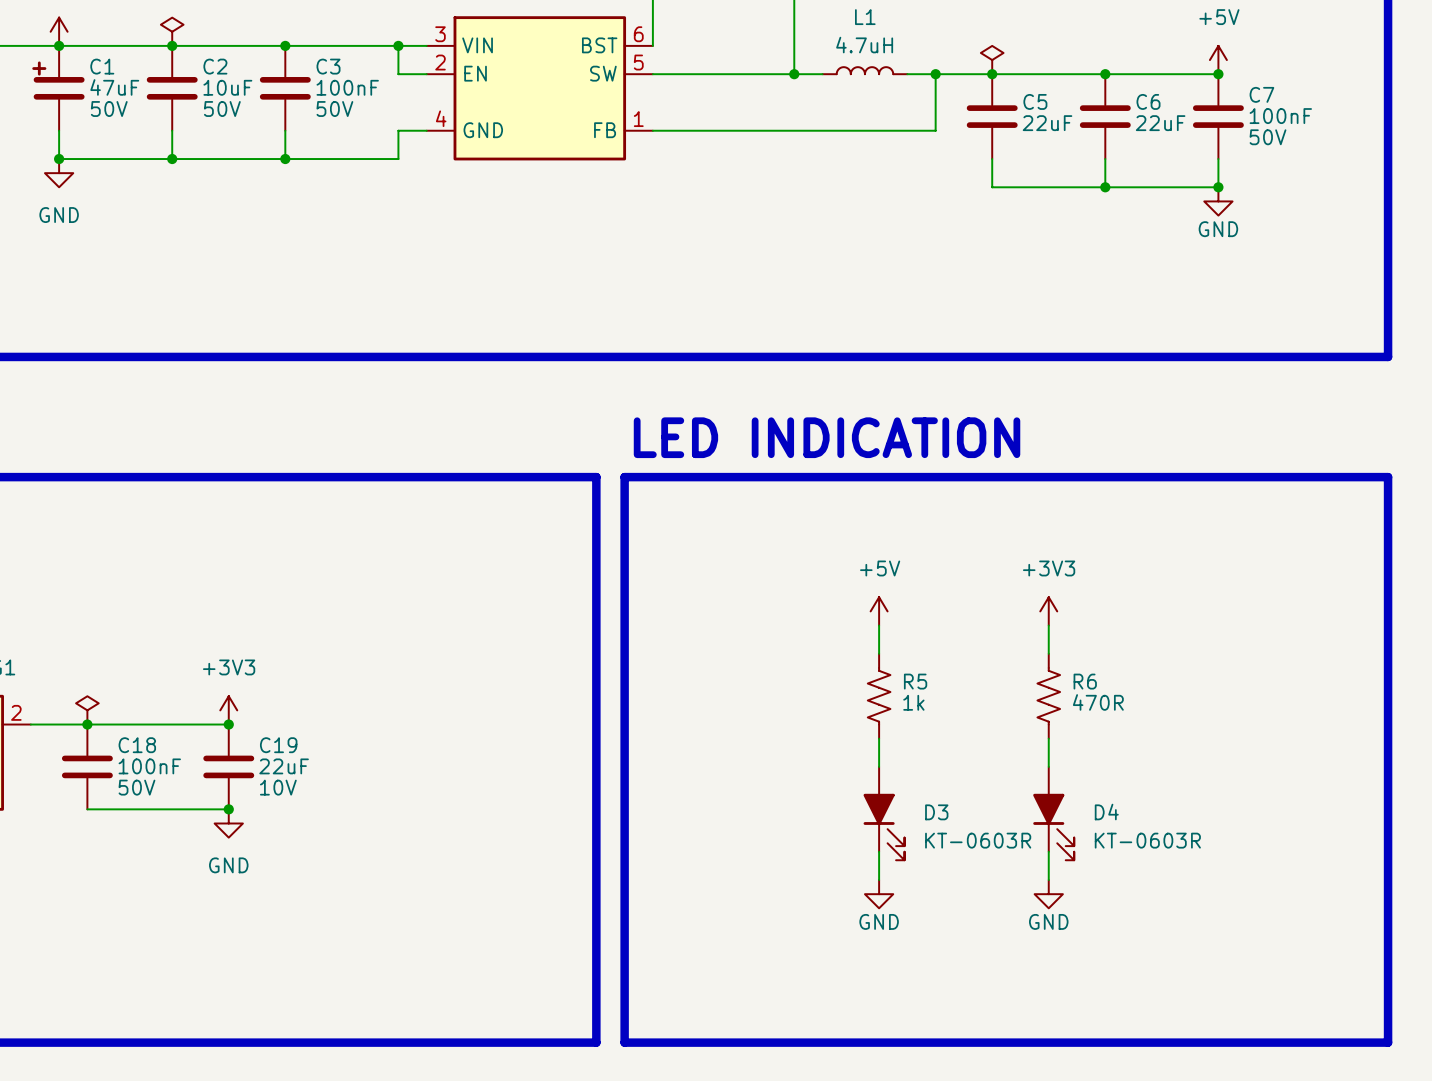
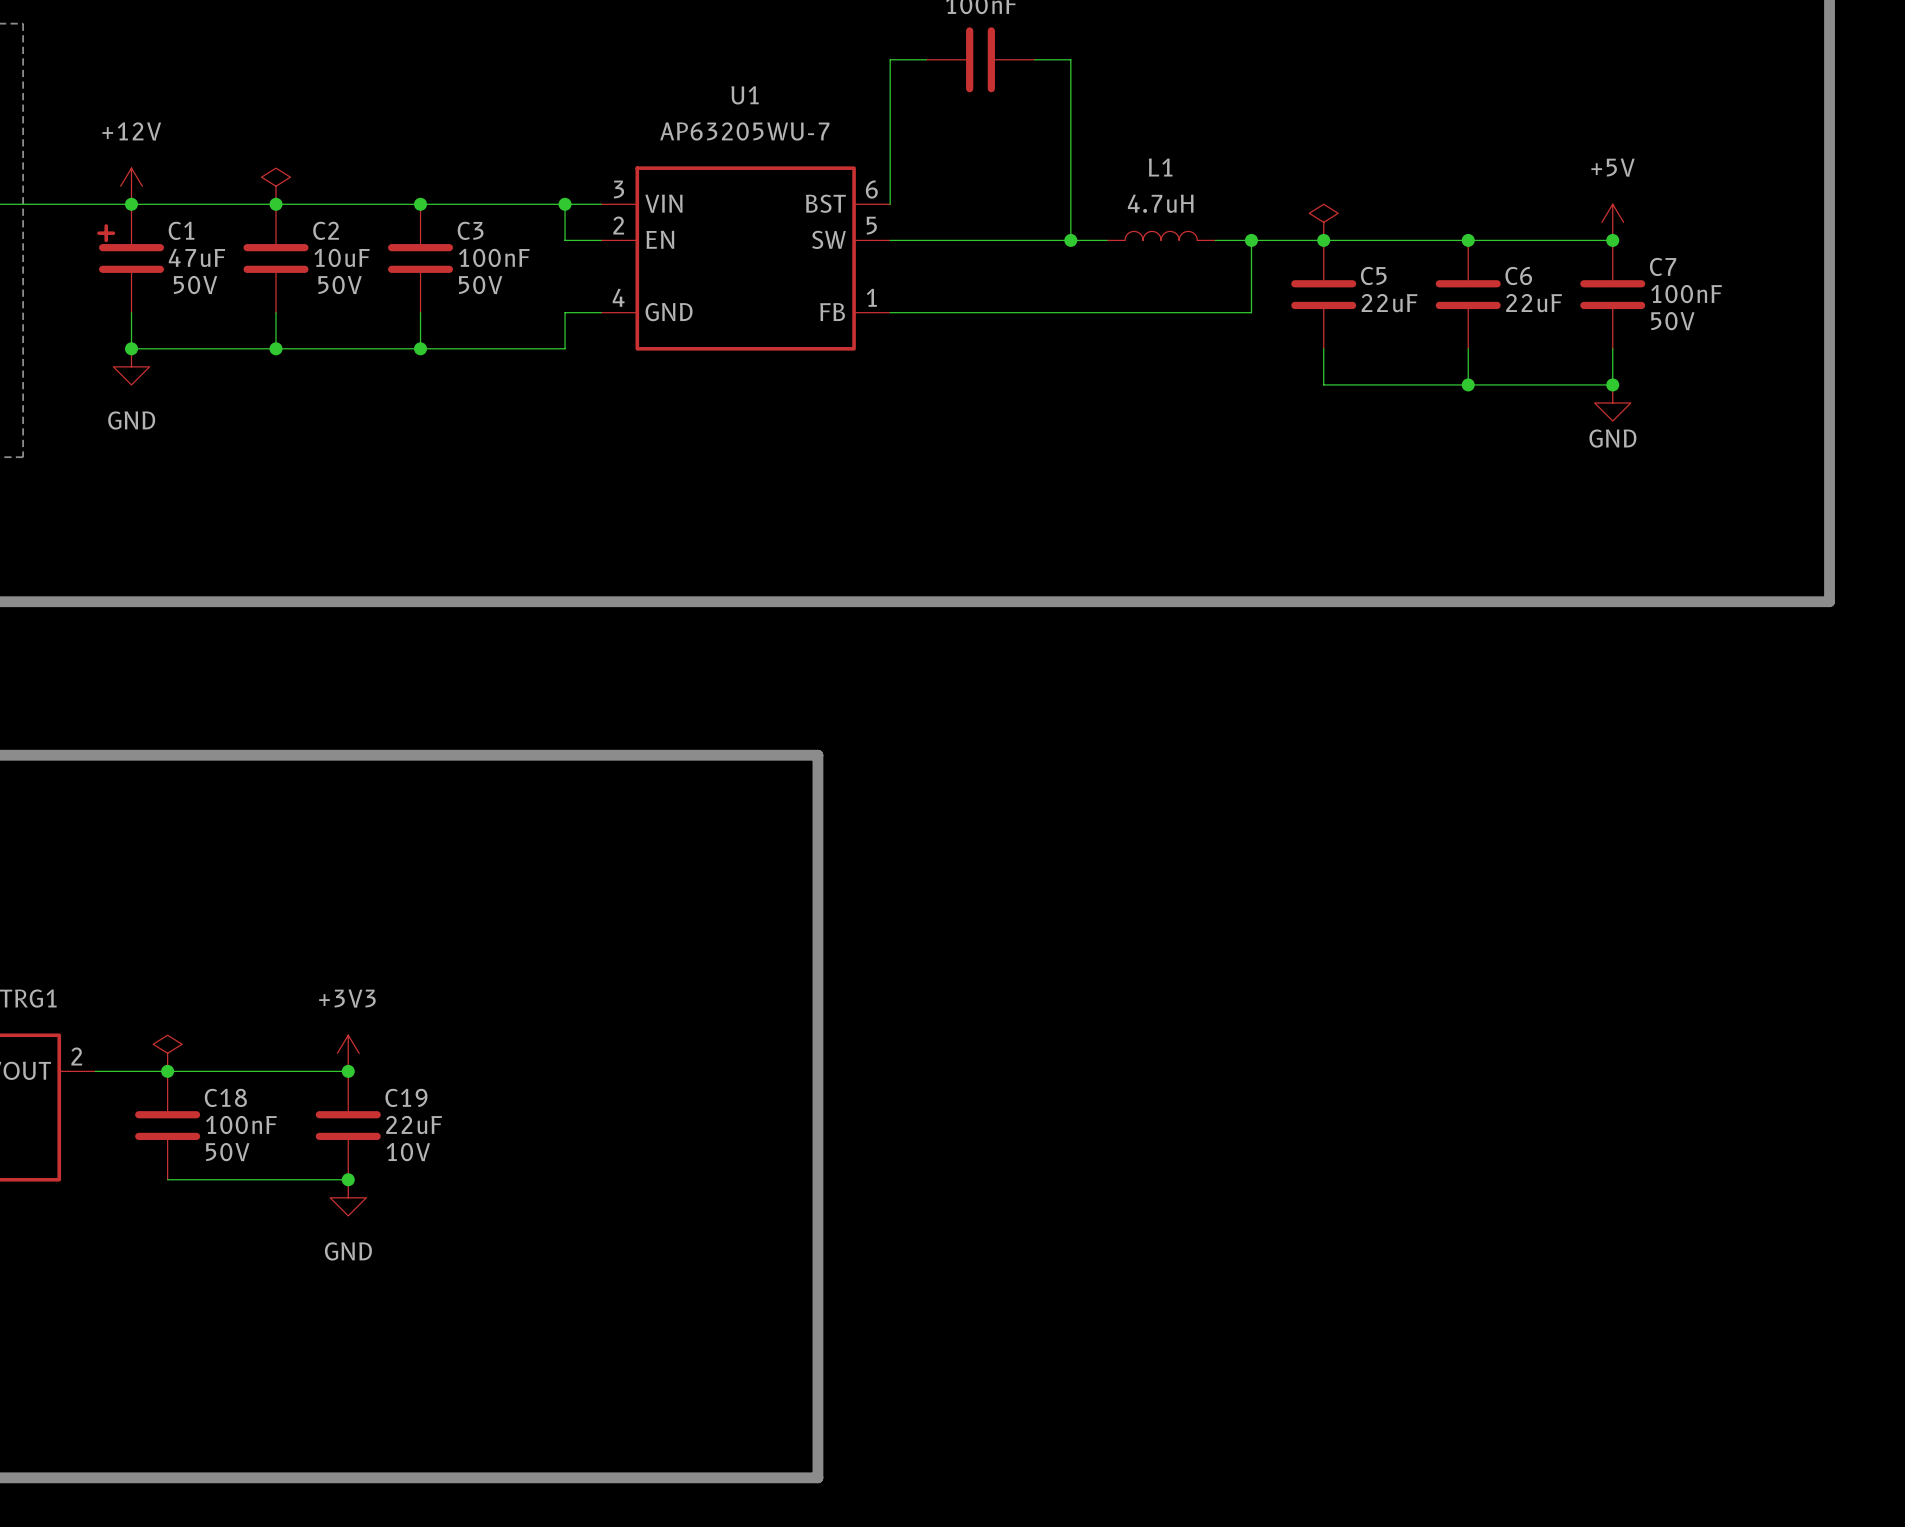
text: LED INDICATION (827, 437) -> none
line: (624, 477) (1388, 477) (1388, 1042) (624, 1042) (624, 477) -> none
power symbol: +5V (879, 611) -> none
power symbol: +3V3 (1048, 611) -> none
wire: (879, 625) (879, 653) -> none
wire: (1048, 625) (1048, 653) -> none
R5: 1k (879, 696) -> none
R6: 470R (1048, 696) -> none
wire: (879, 738) (879, 766) -> none
wire: (1048, 738) (1048, 766) -> none
D3: KT-0603R (884, 813) -> none
D4: KT-0603R (1053, 813) -> none
wire: (879, 851) (879, 880) -> none
wire: (1048, 851) (1048, 880) -> none
power symbol: GND (879, 894) -> none
power symbol: GND (1048, 894) -> none

